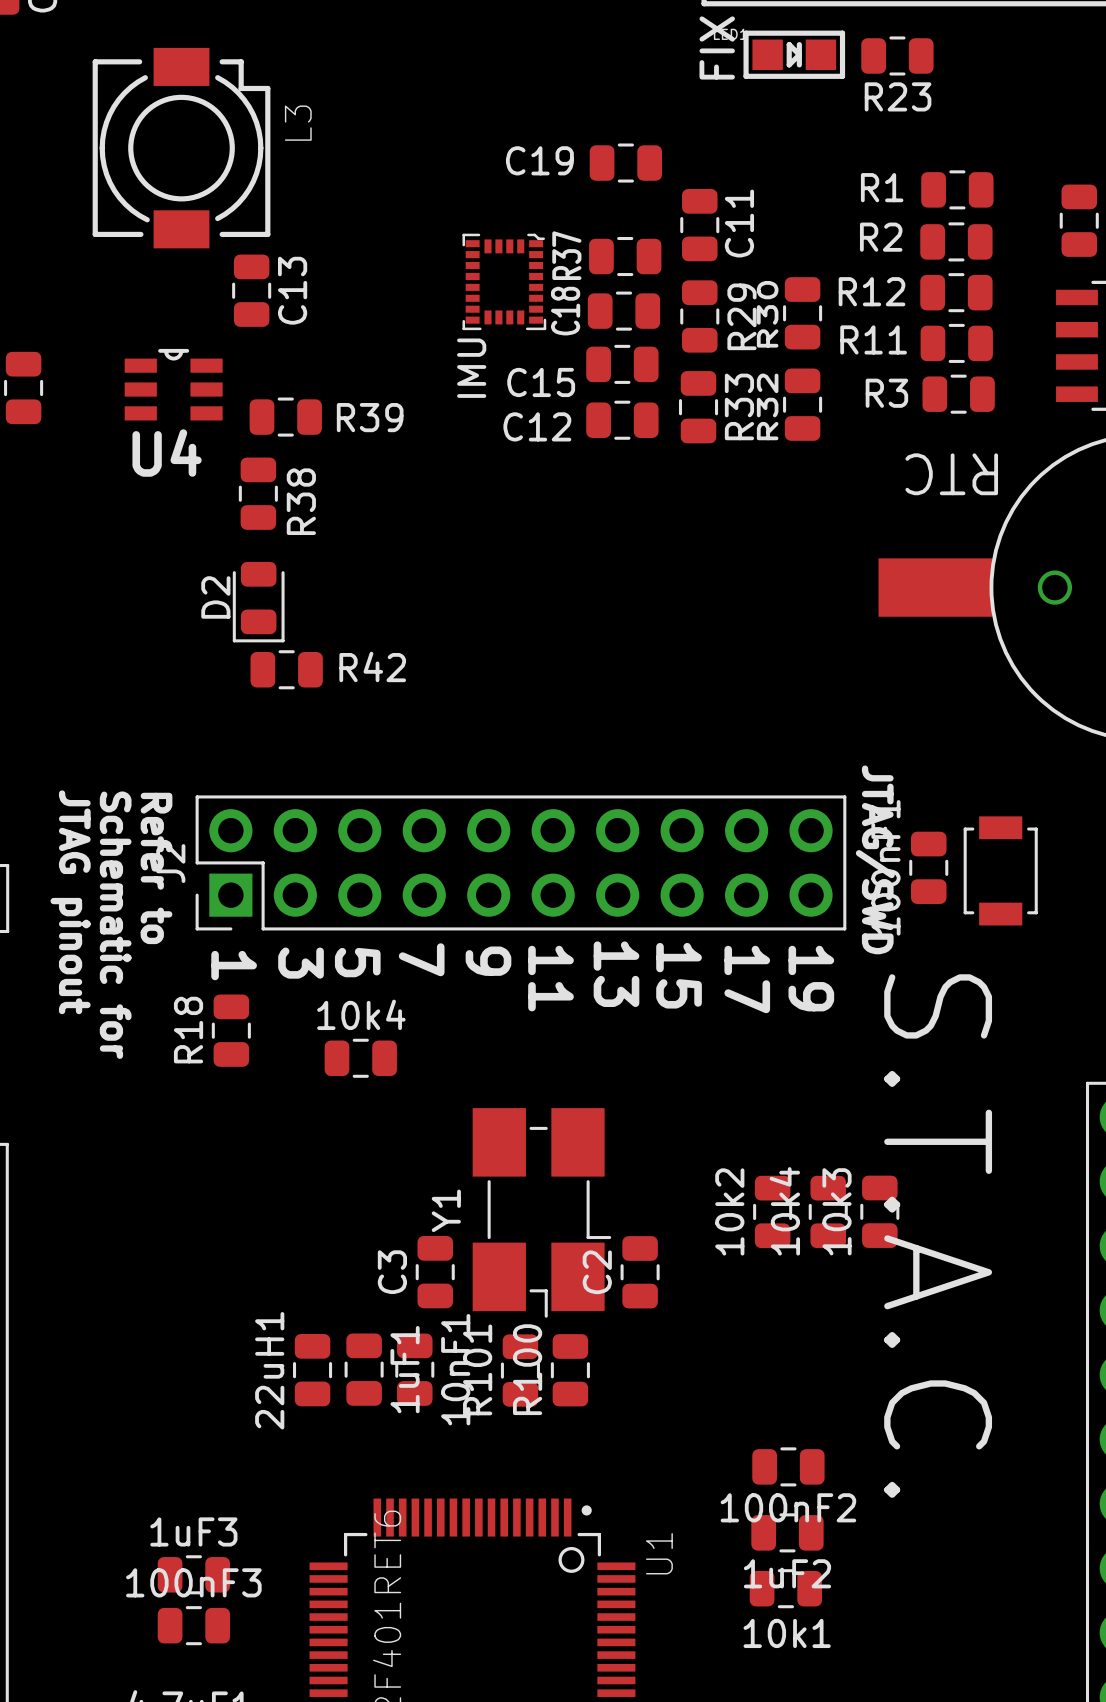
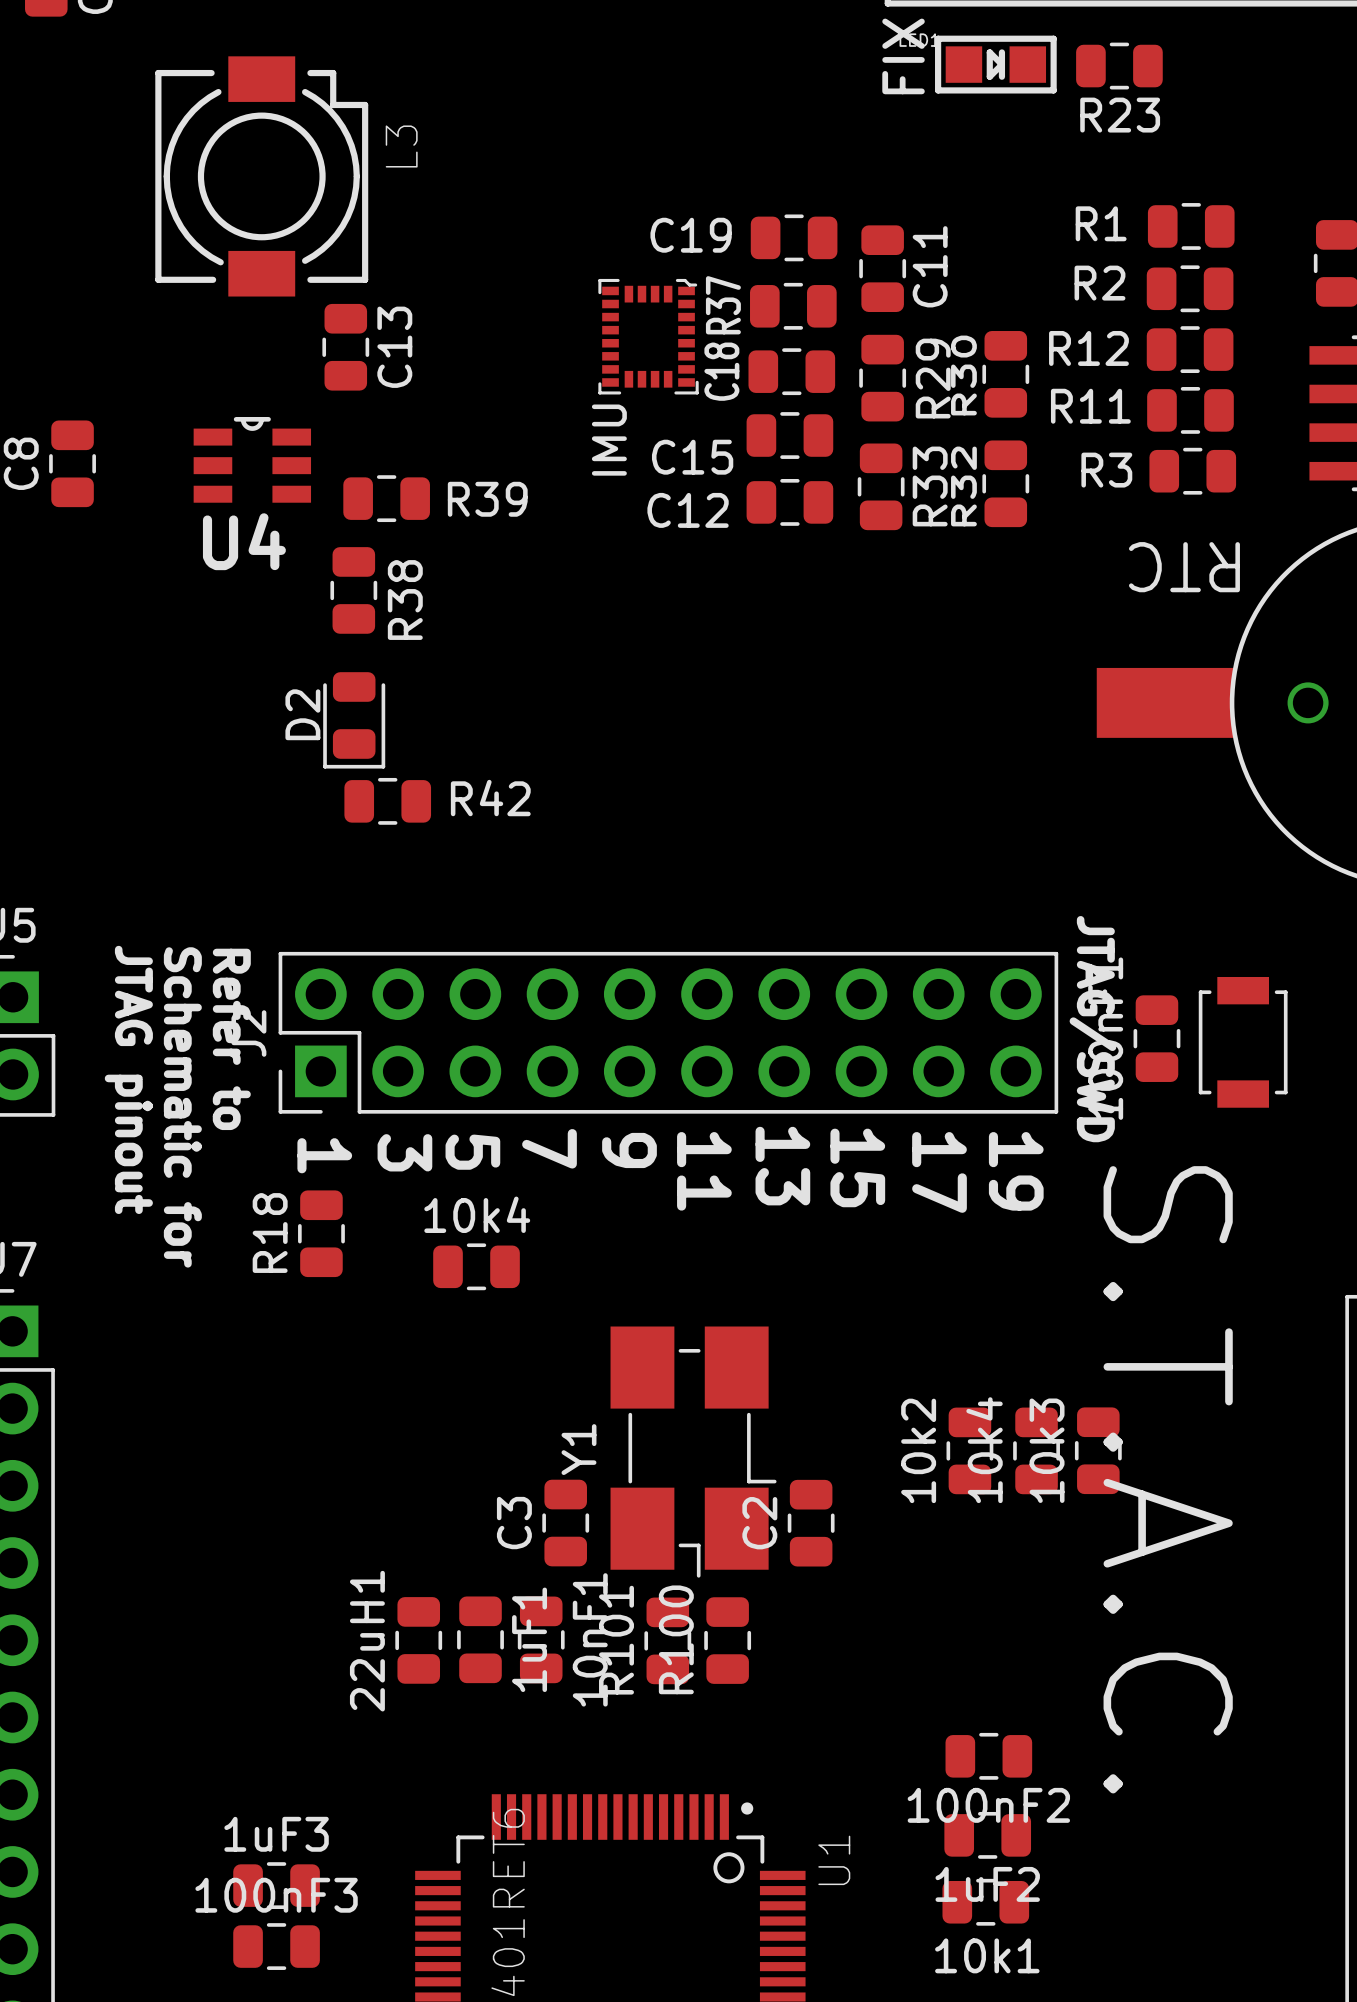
C19 position: (625, 163) -> (794, 237)

